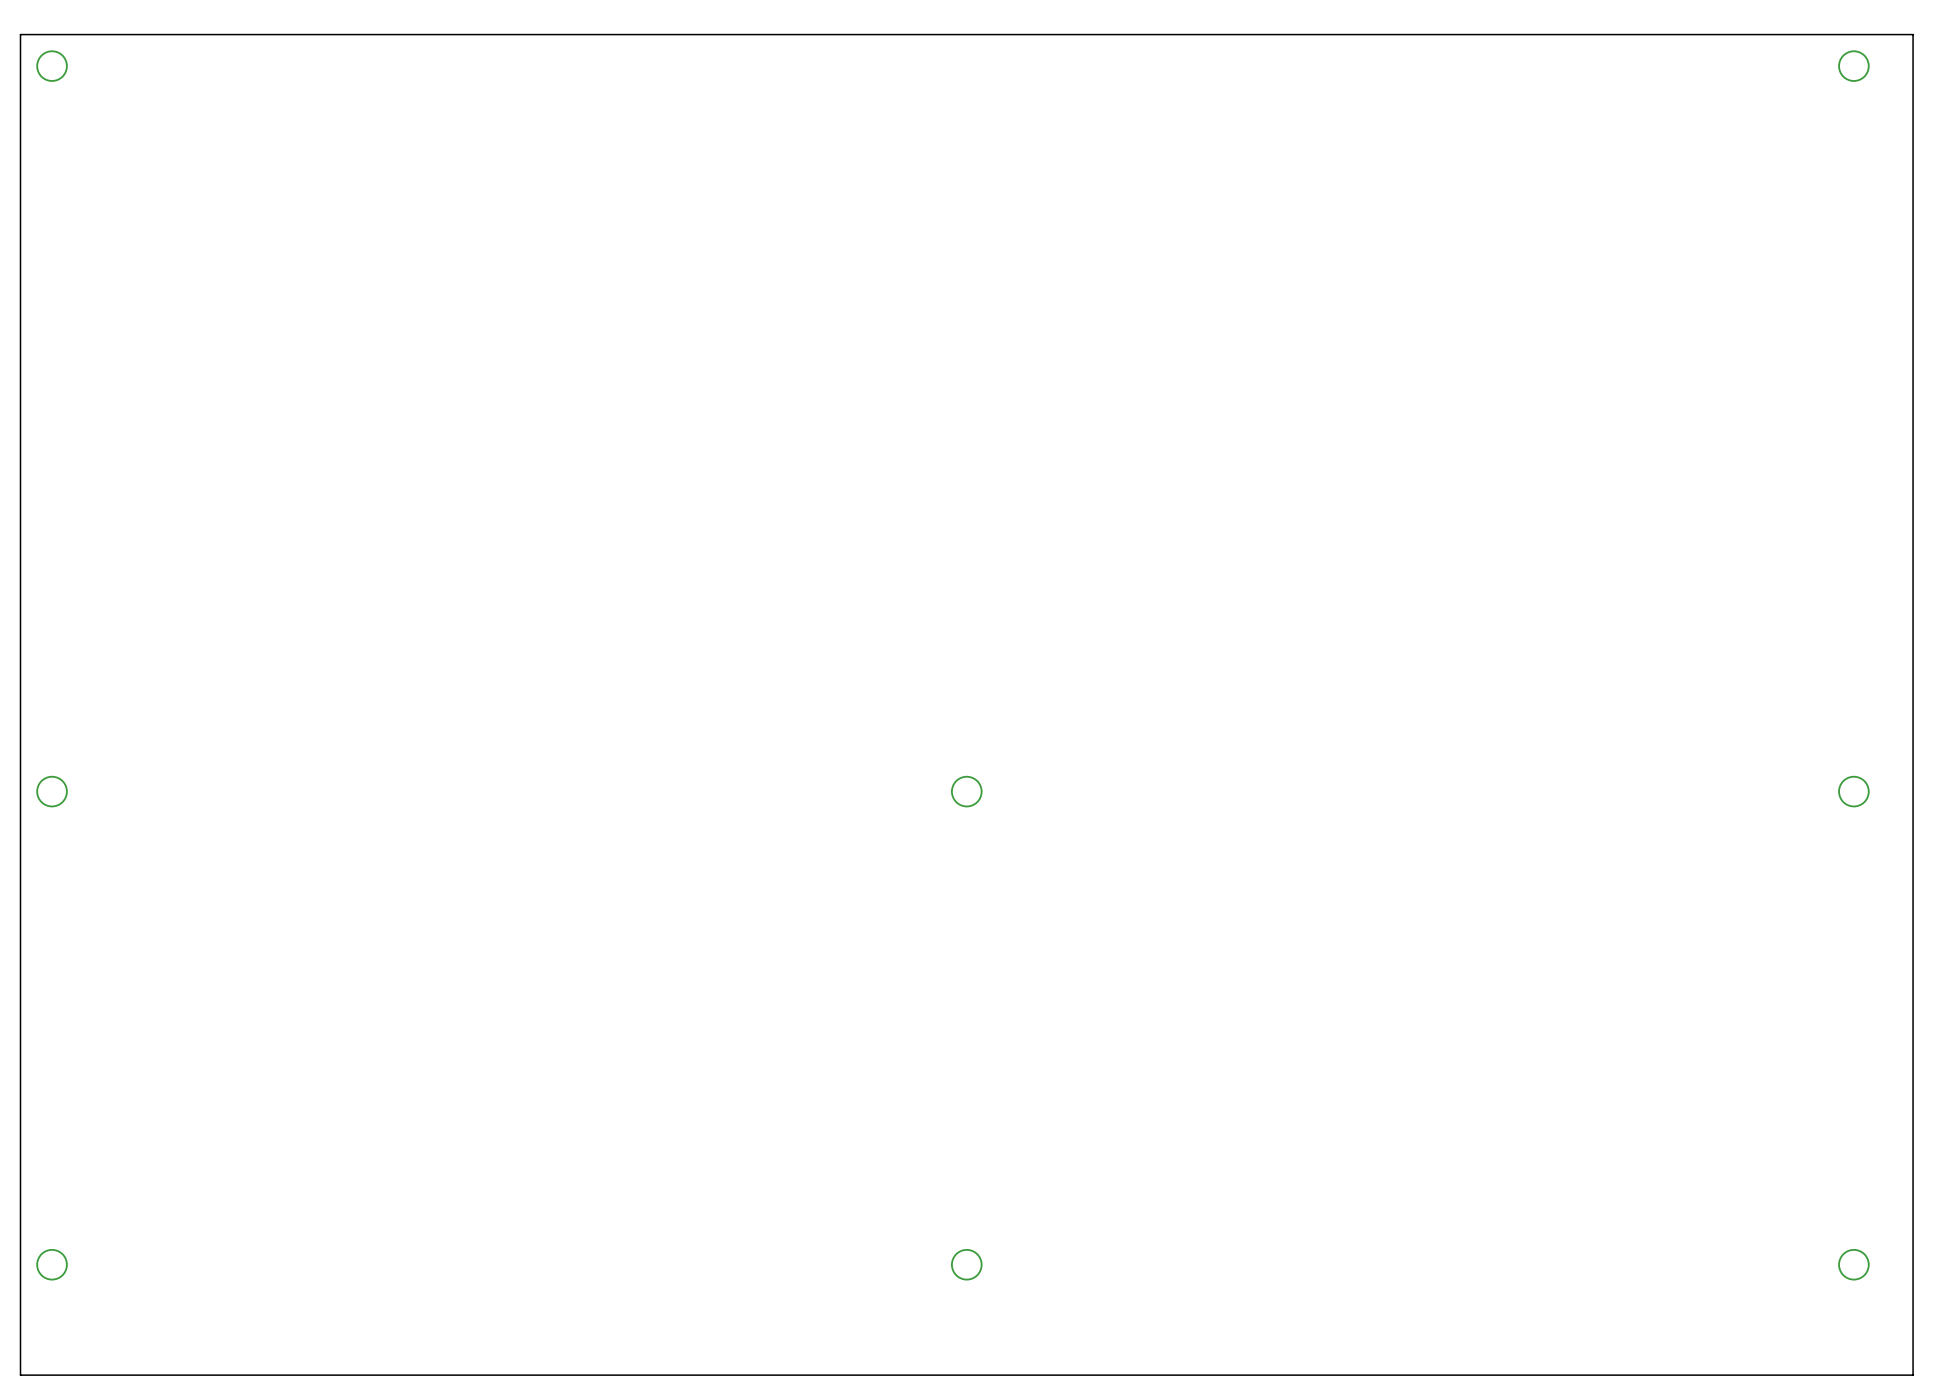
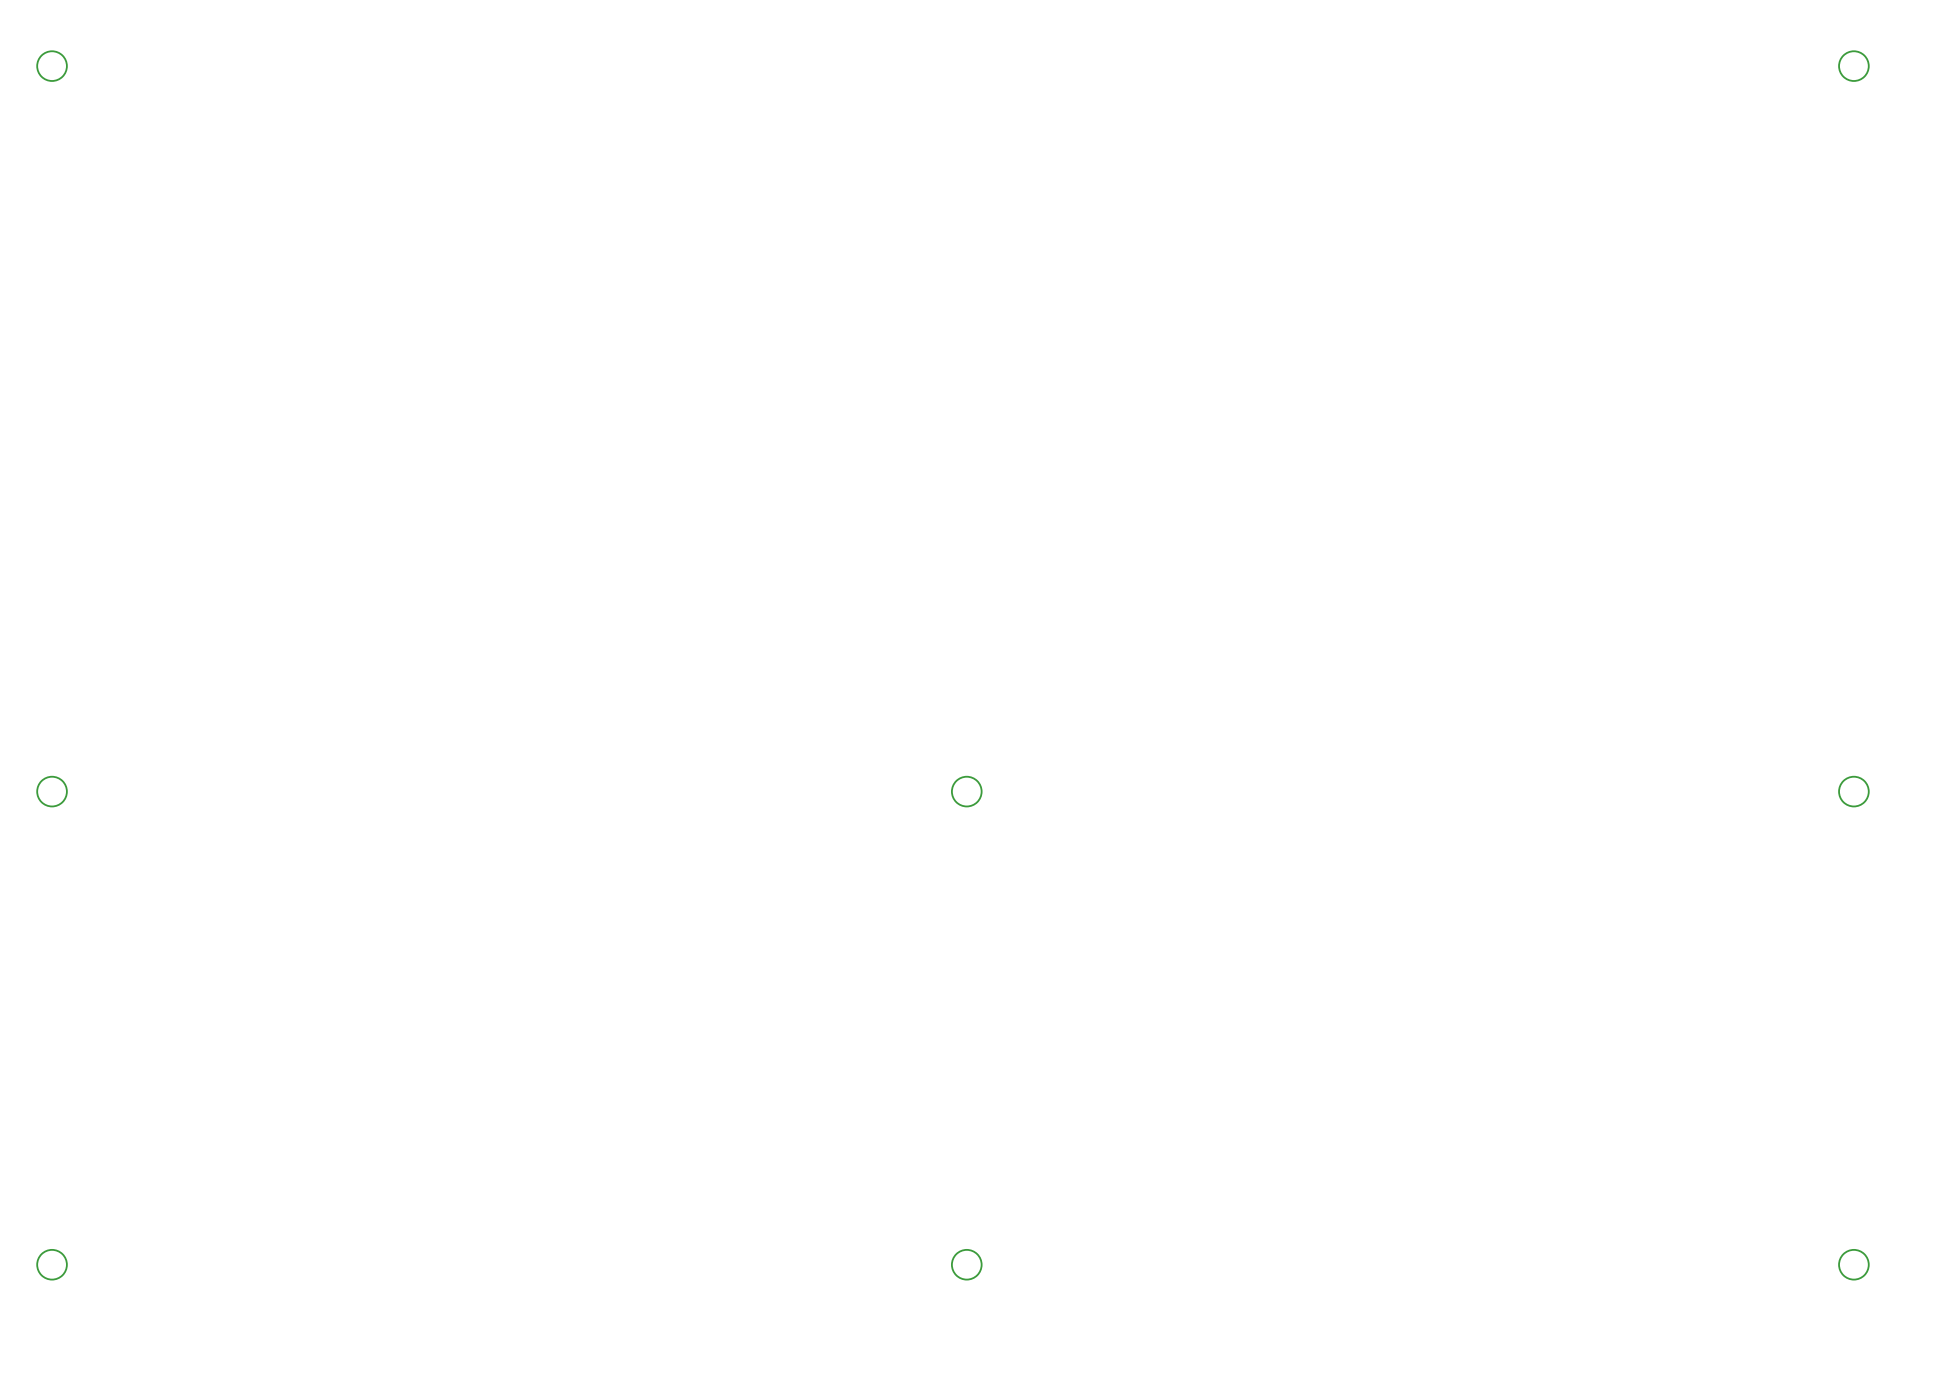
board edge: (1913, 34) (20, 34) (20, 1375) (1913, 1375) (1913, 34) -> none

